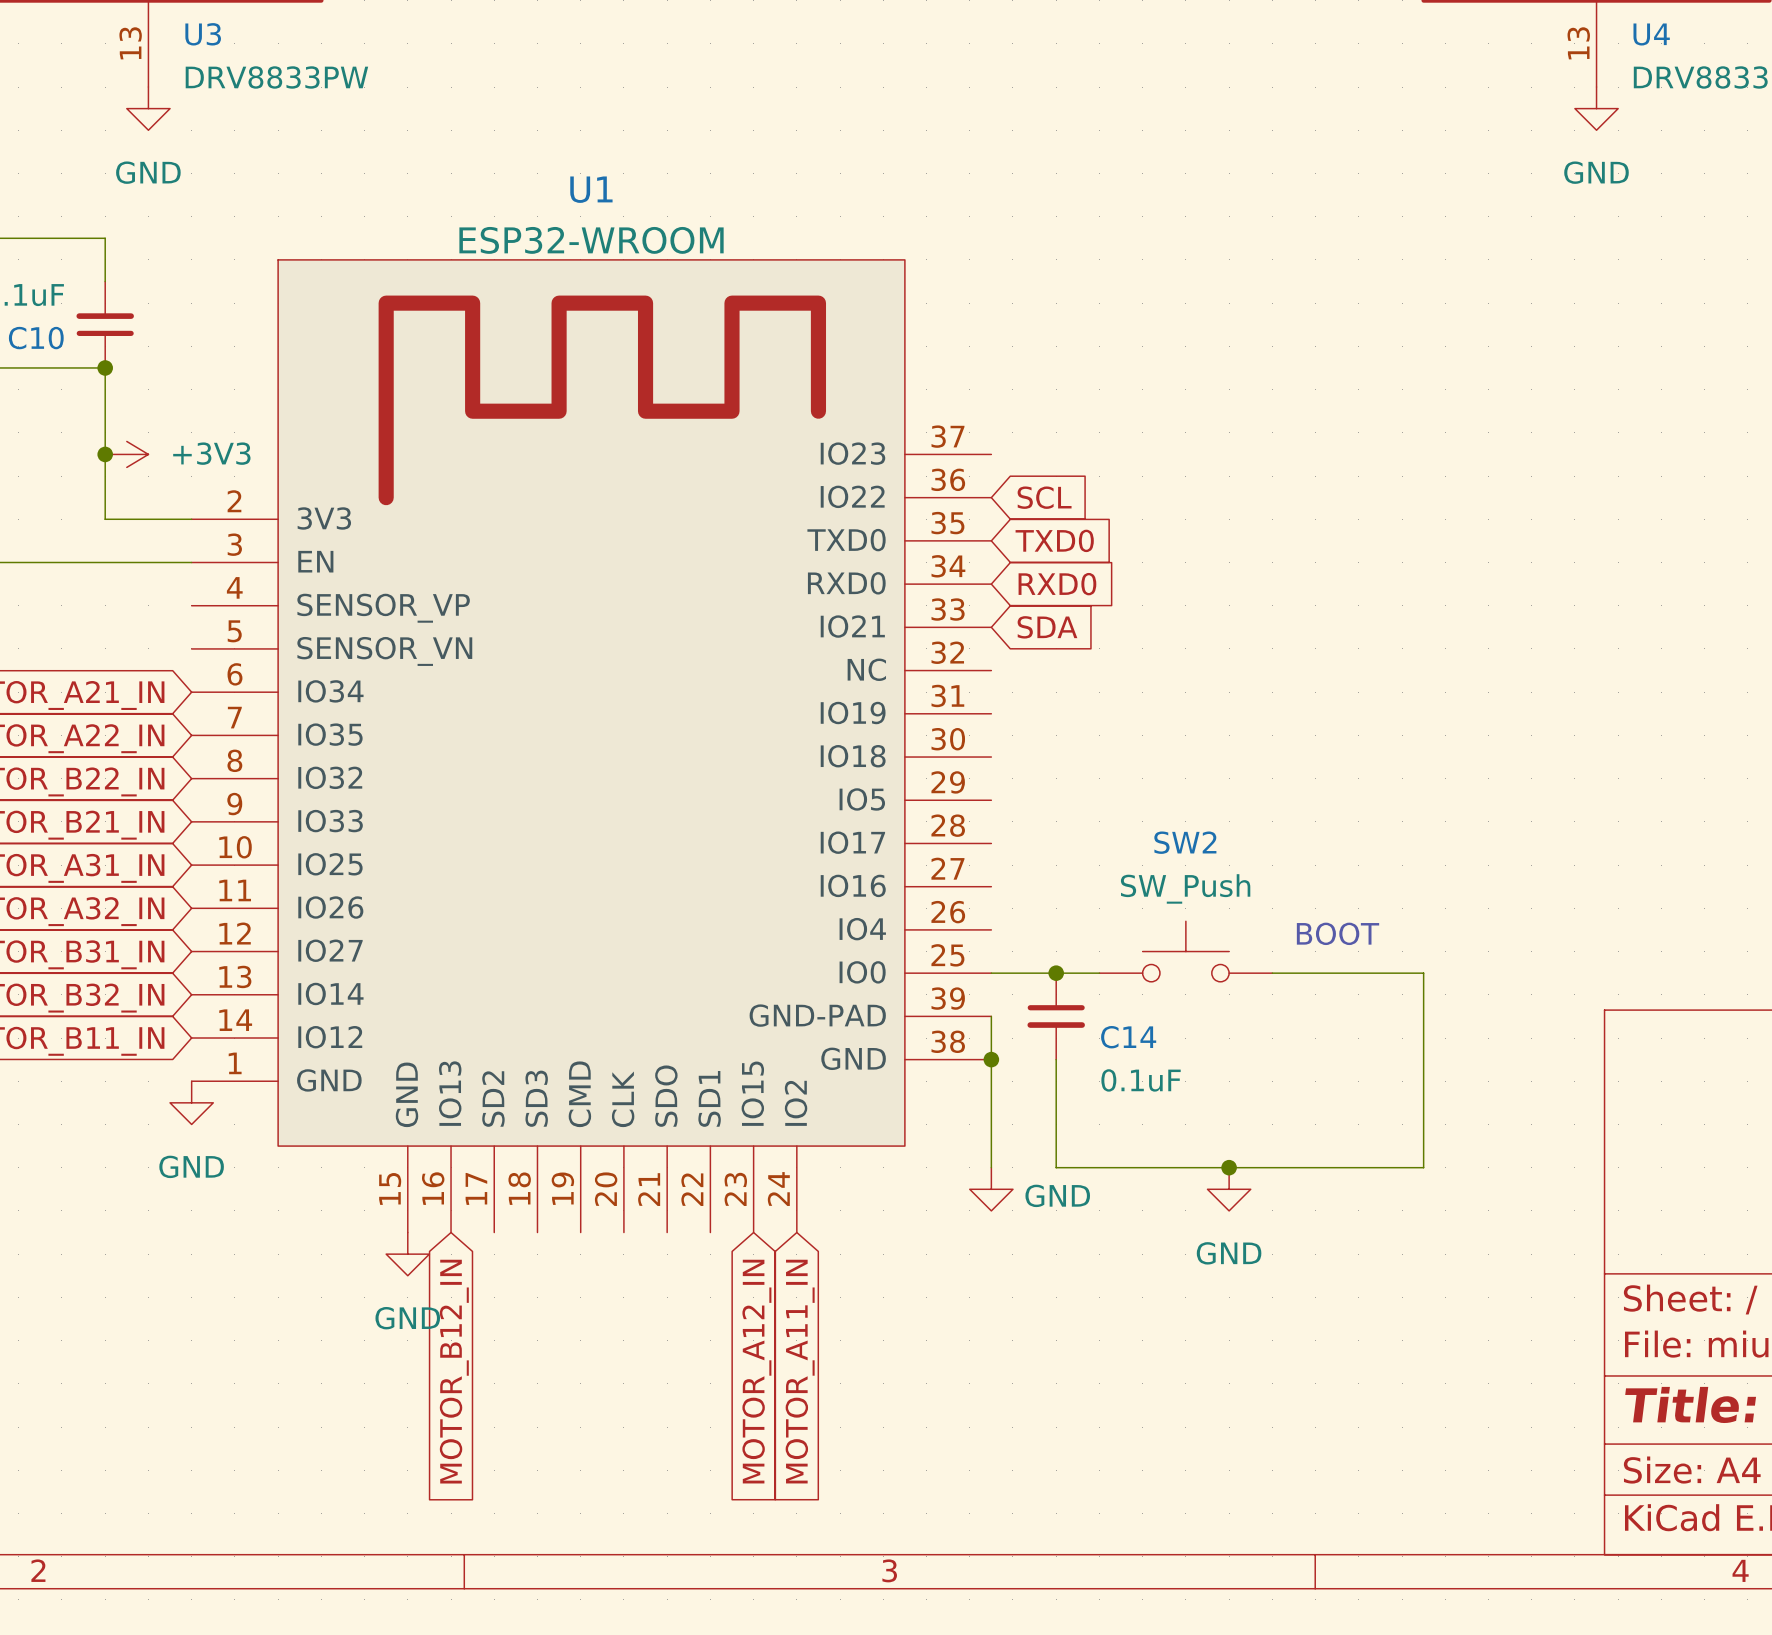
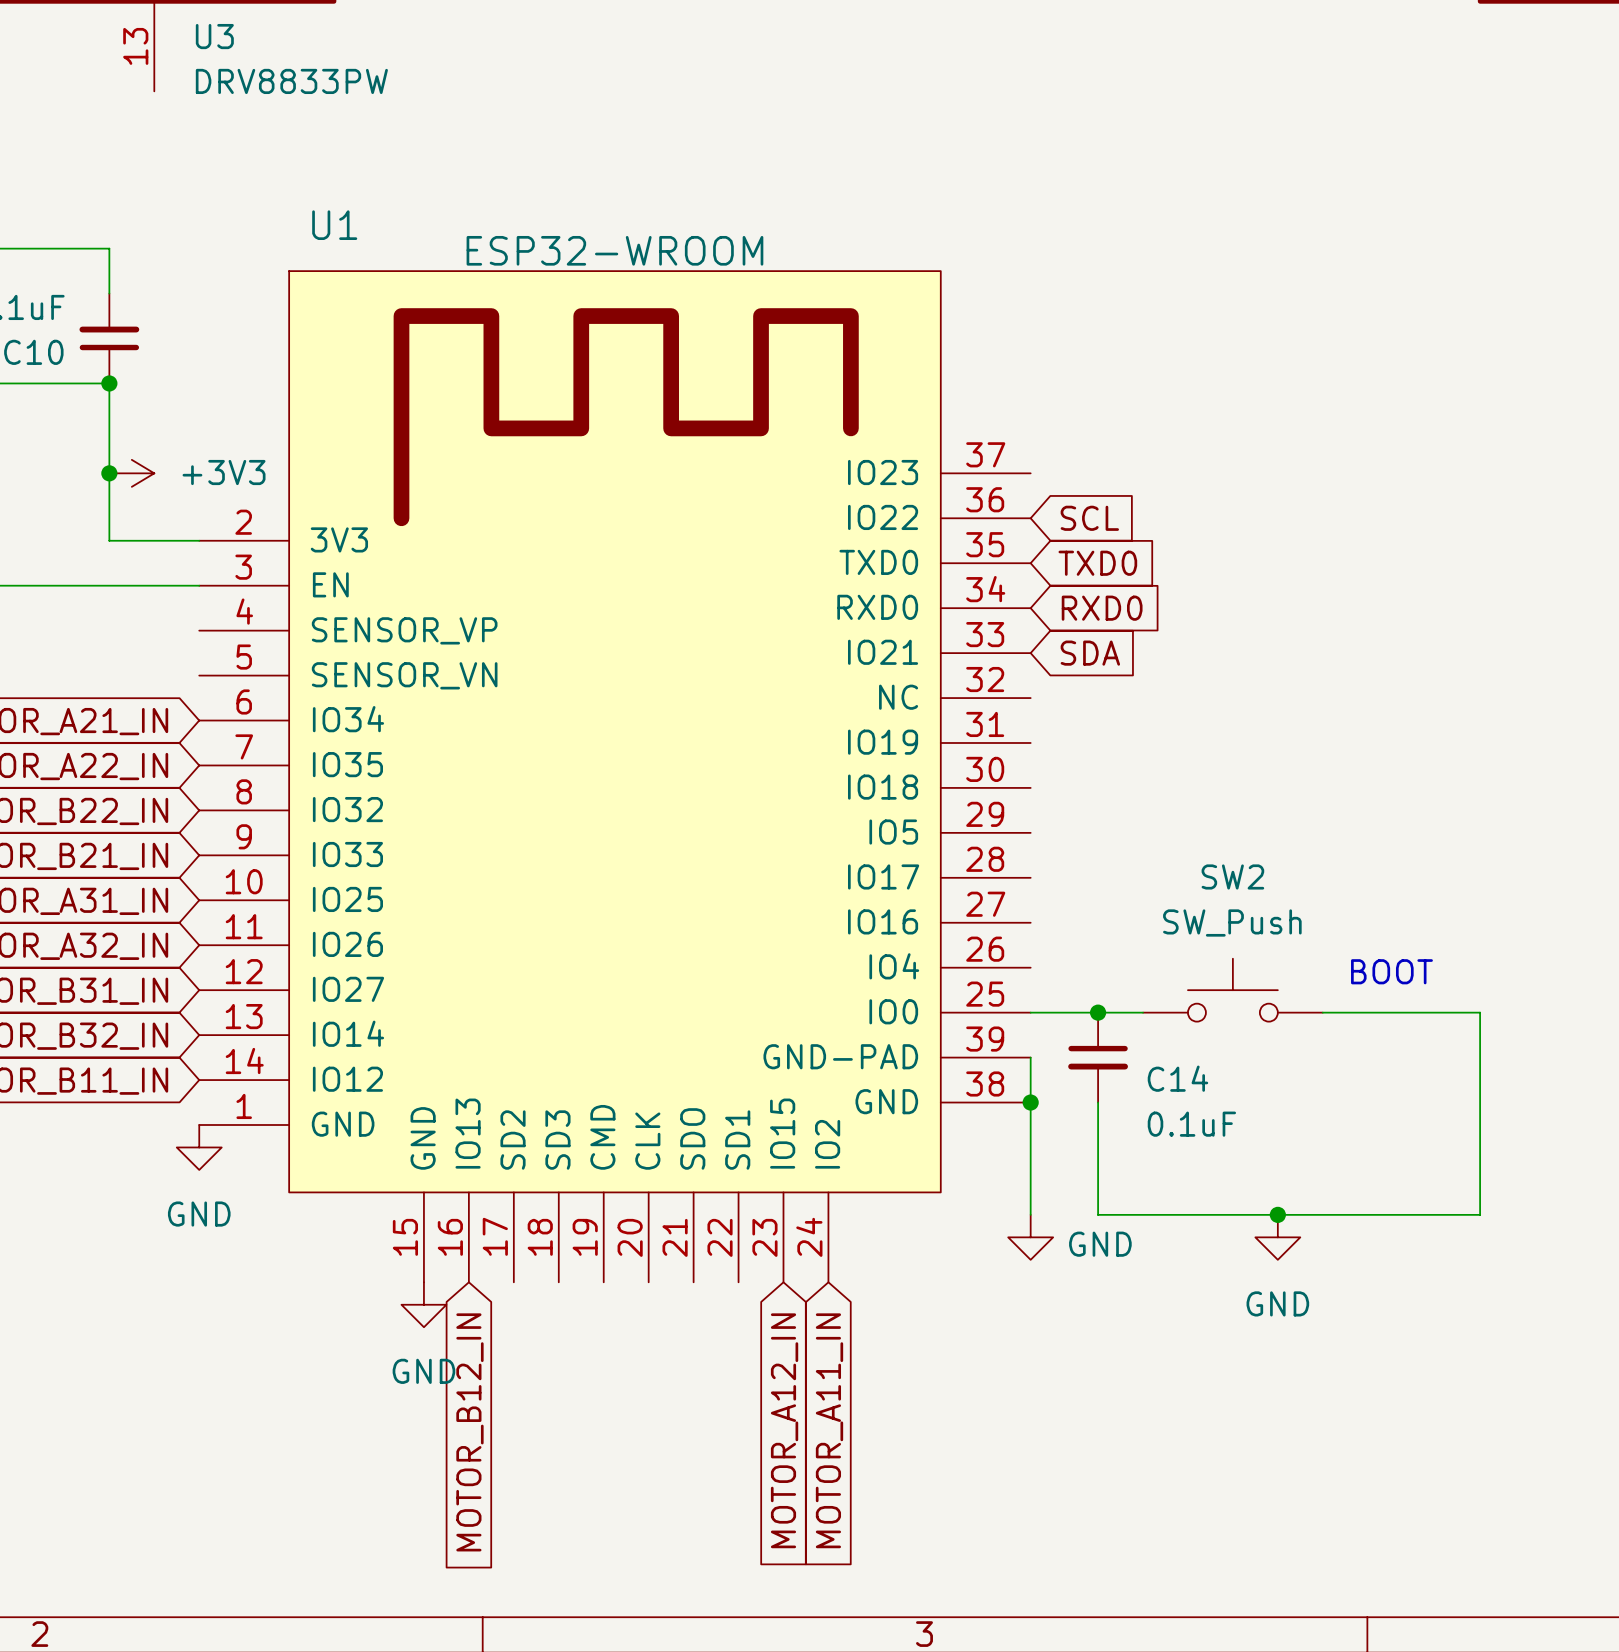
power symbol: GND (148, 108) -> none
U1 name position: U1 (591, 189) -> U1 (334, 225)

